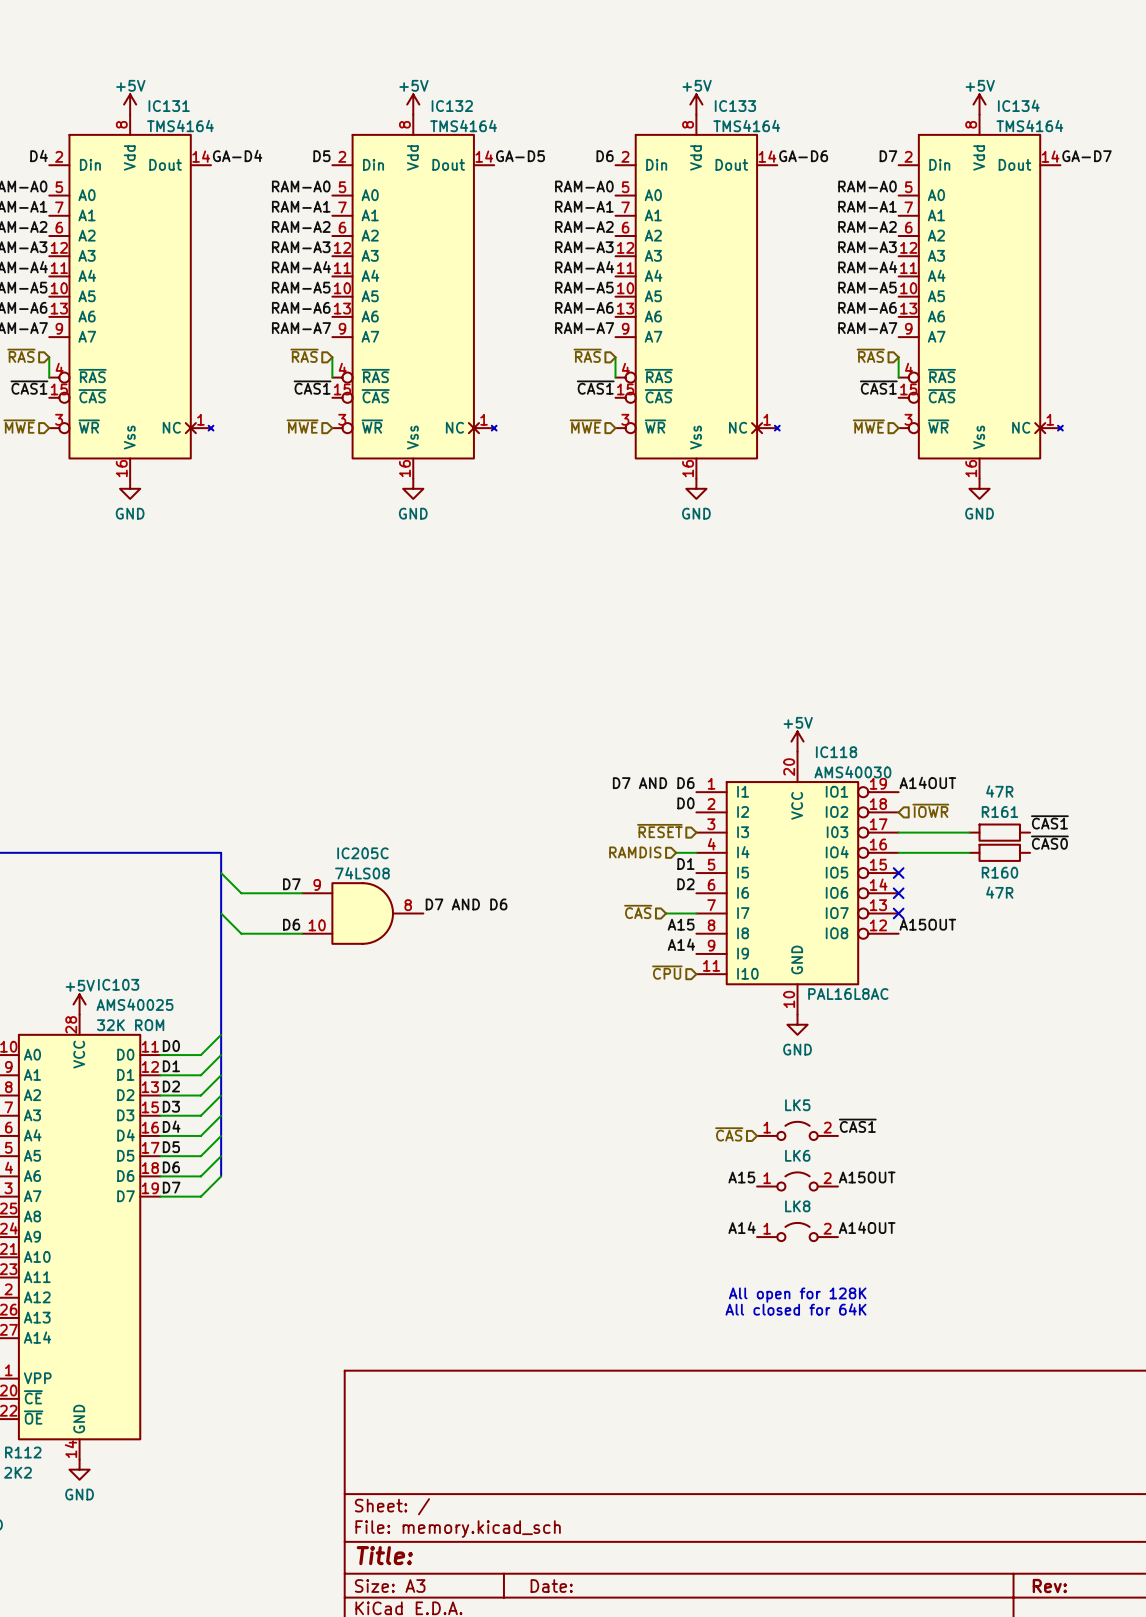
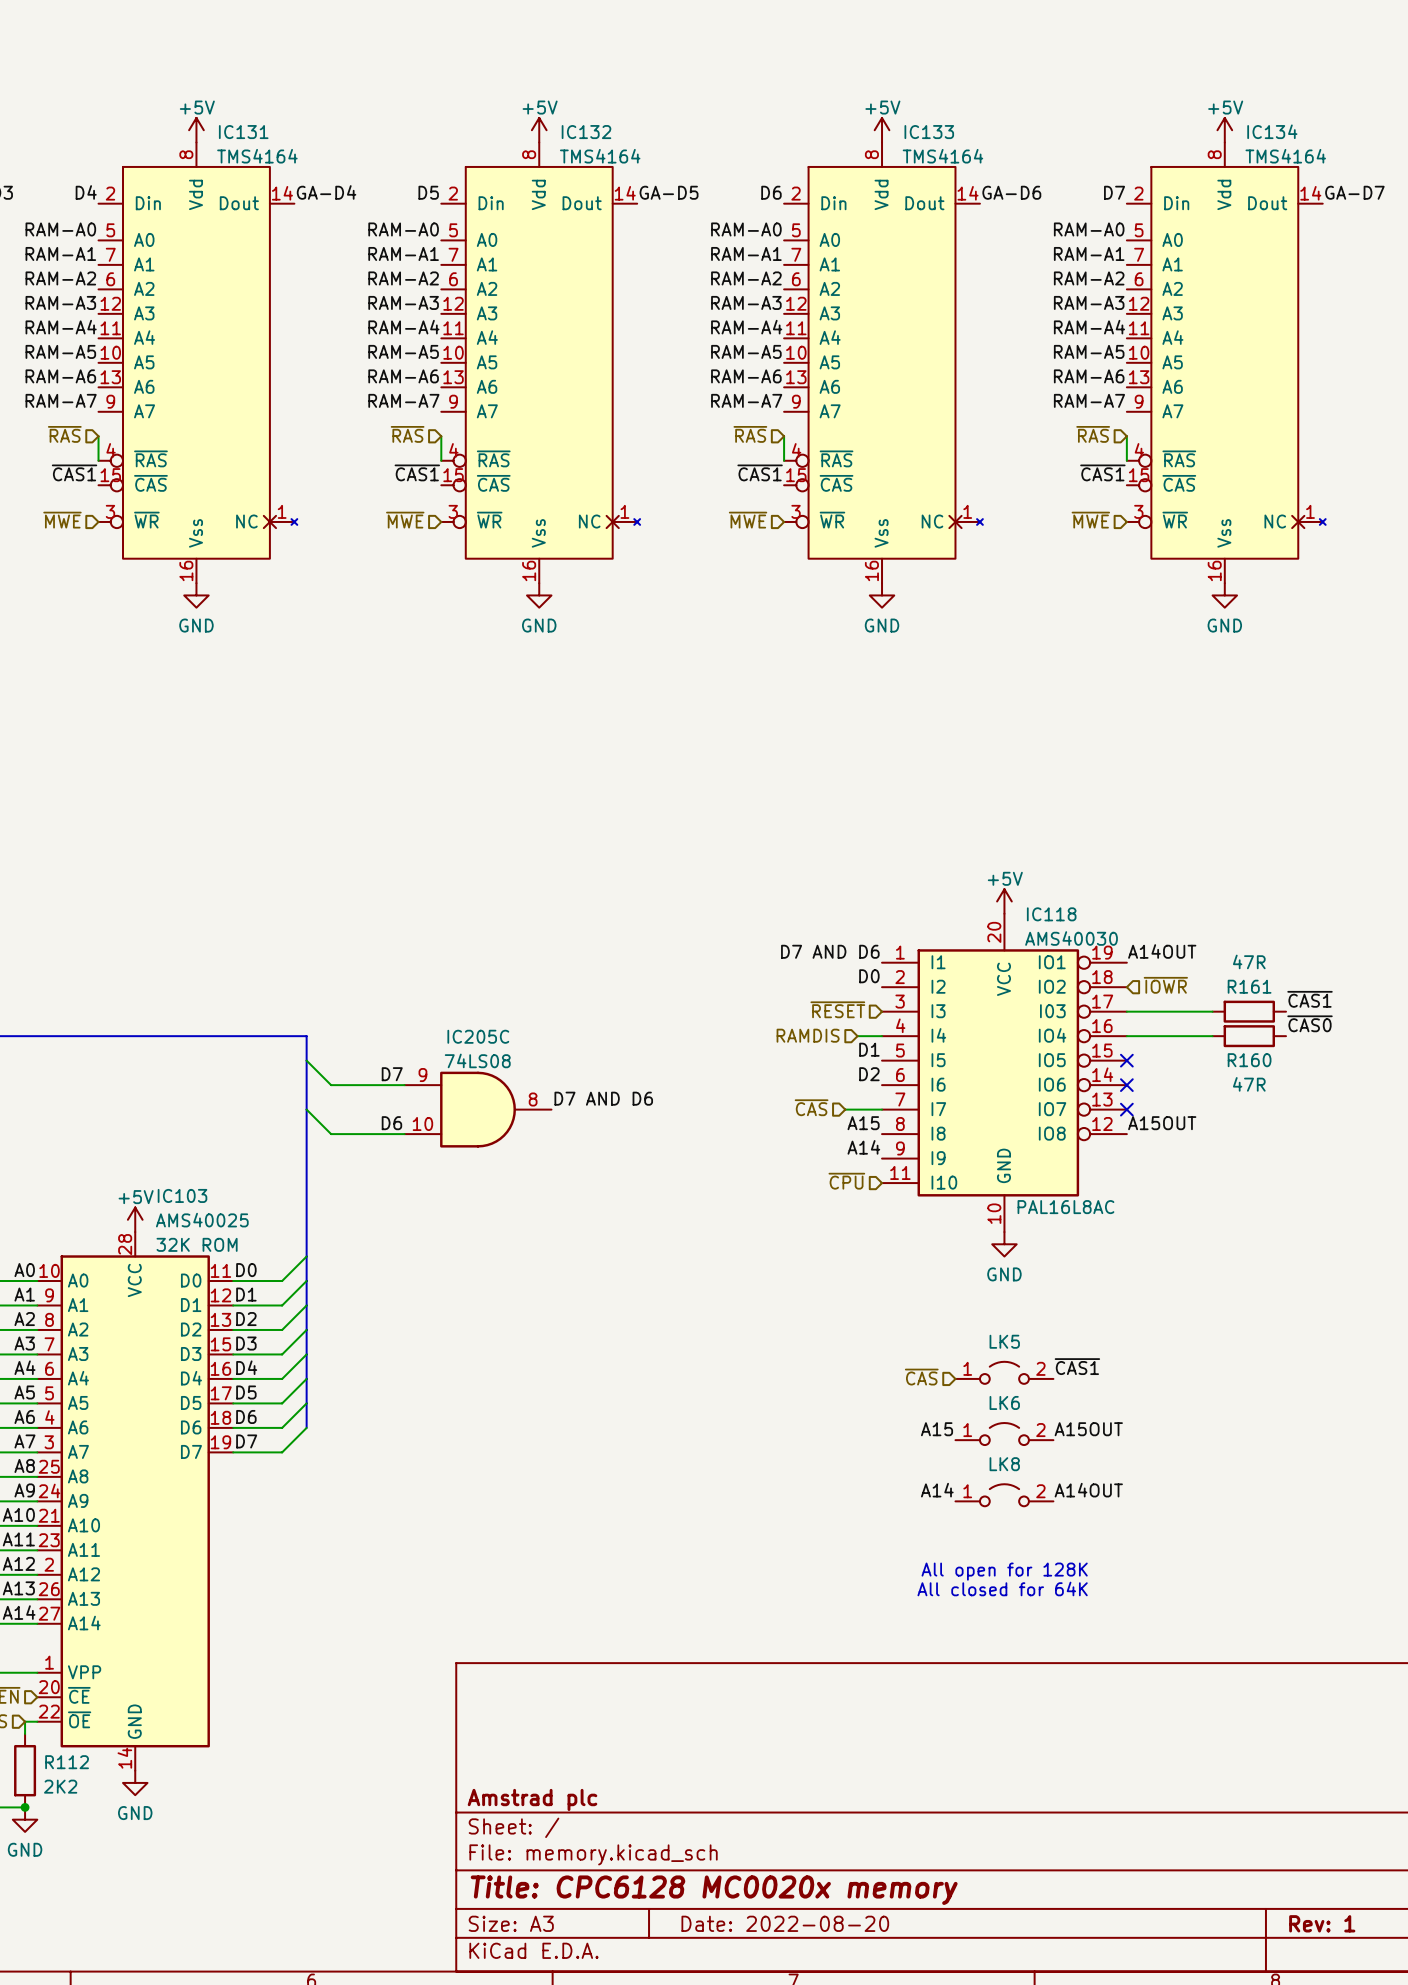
title block: none -> Amstrad plc (532, 1799)
title block: Title: (384, 1555) -> Title: CPC6128 MC0020x memory (714, 1890)
title block: Date: (551, 1586) -> Date: 2022-08-20 (785, 1923)
title block: Rev: (1049, 1586) -> Rev: 1 (1322, 1923)

